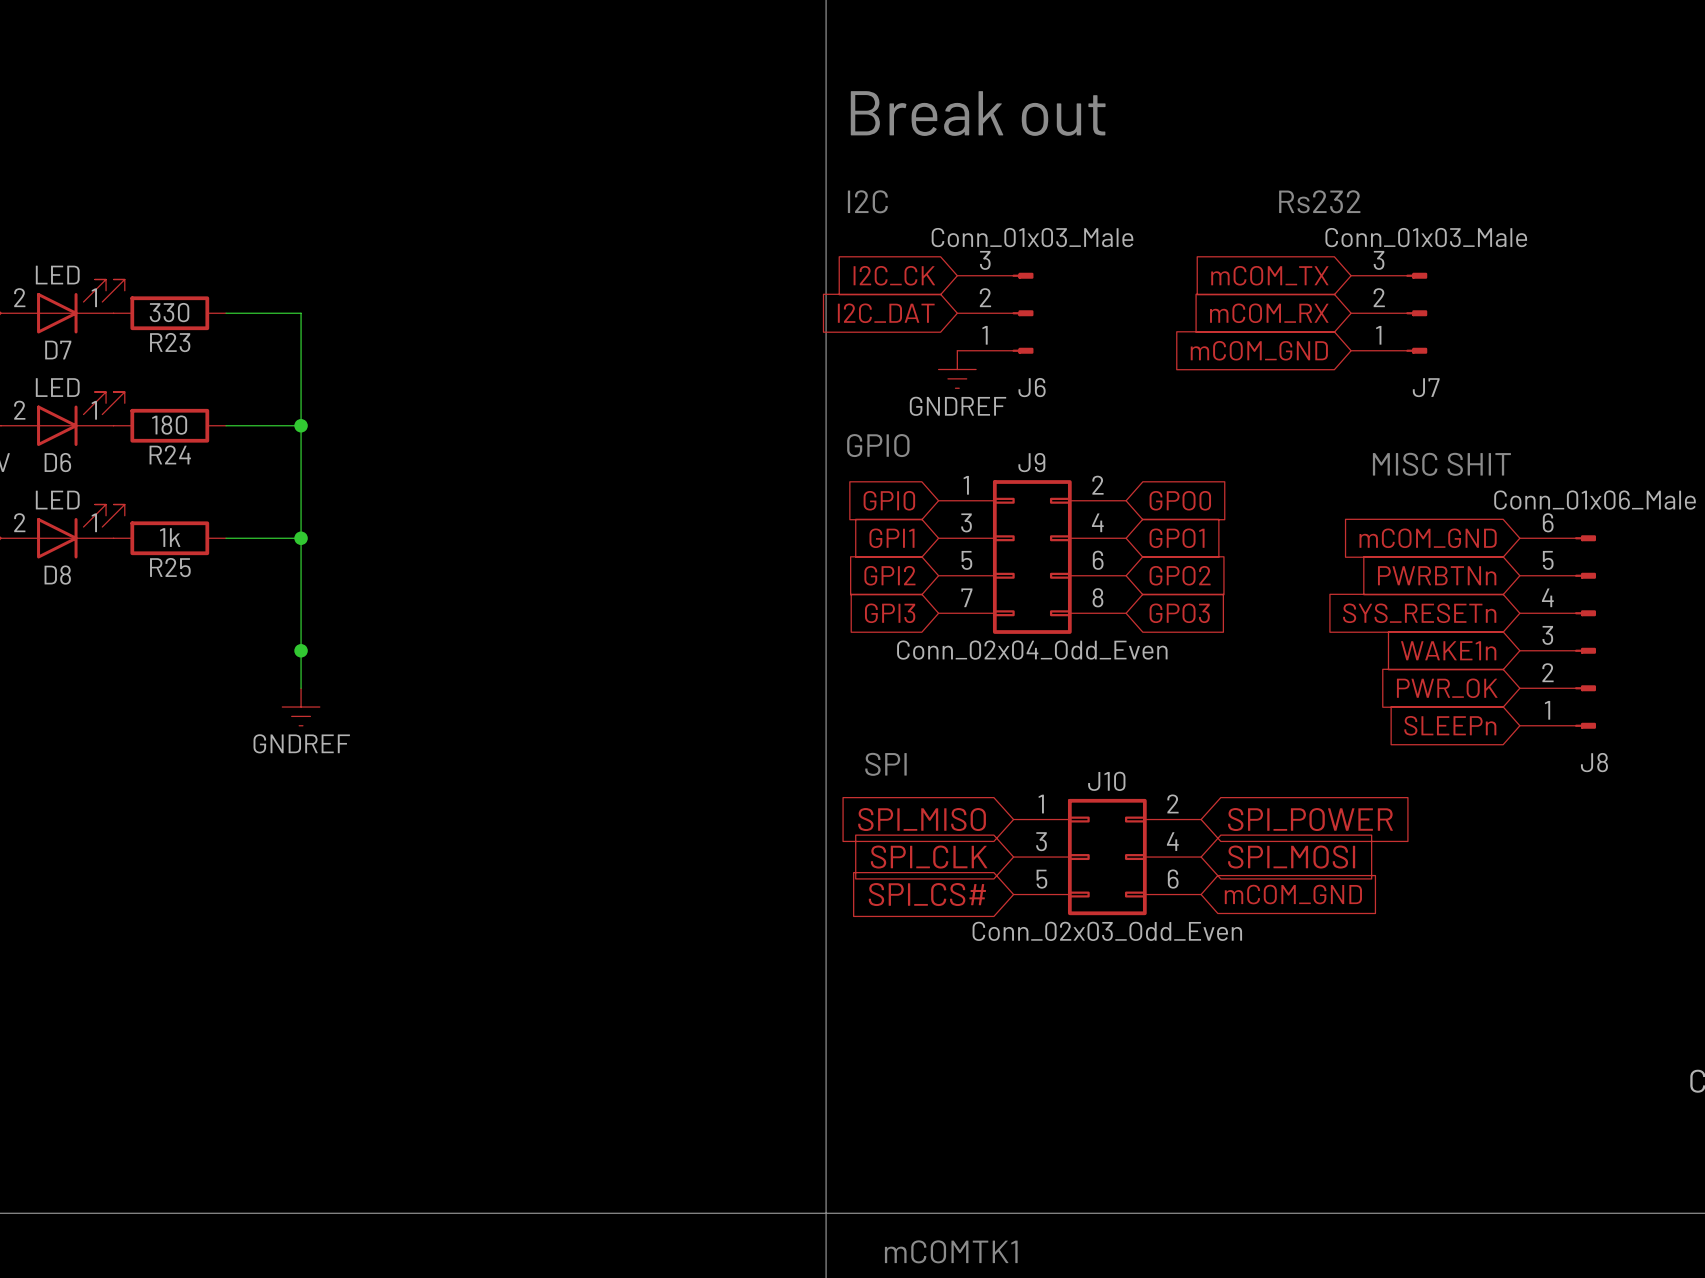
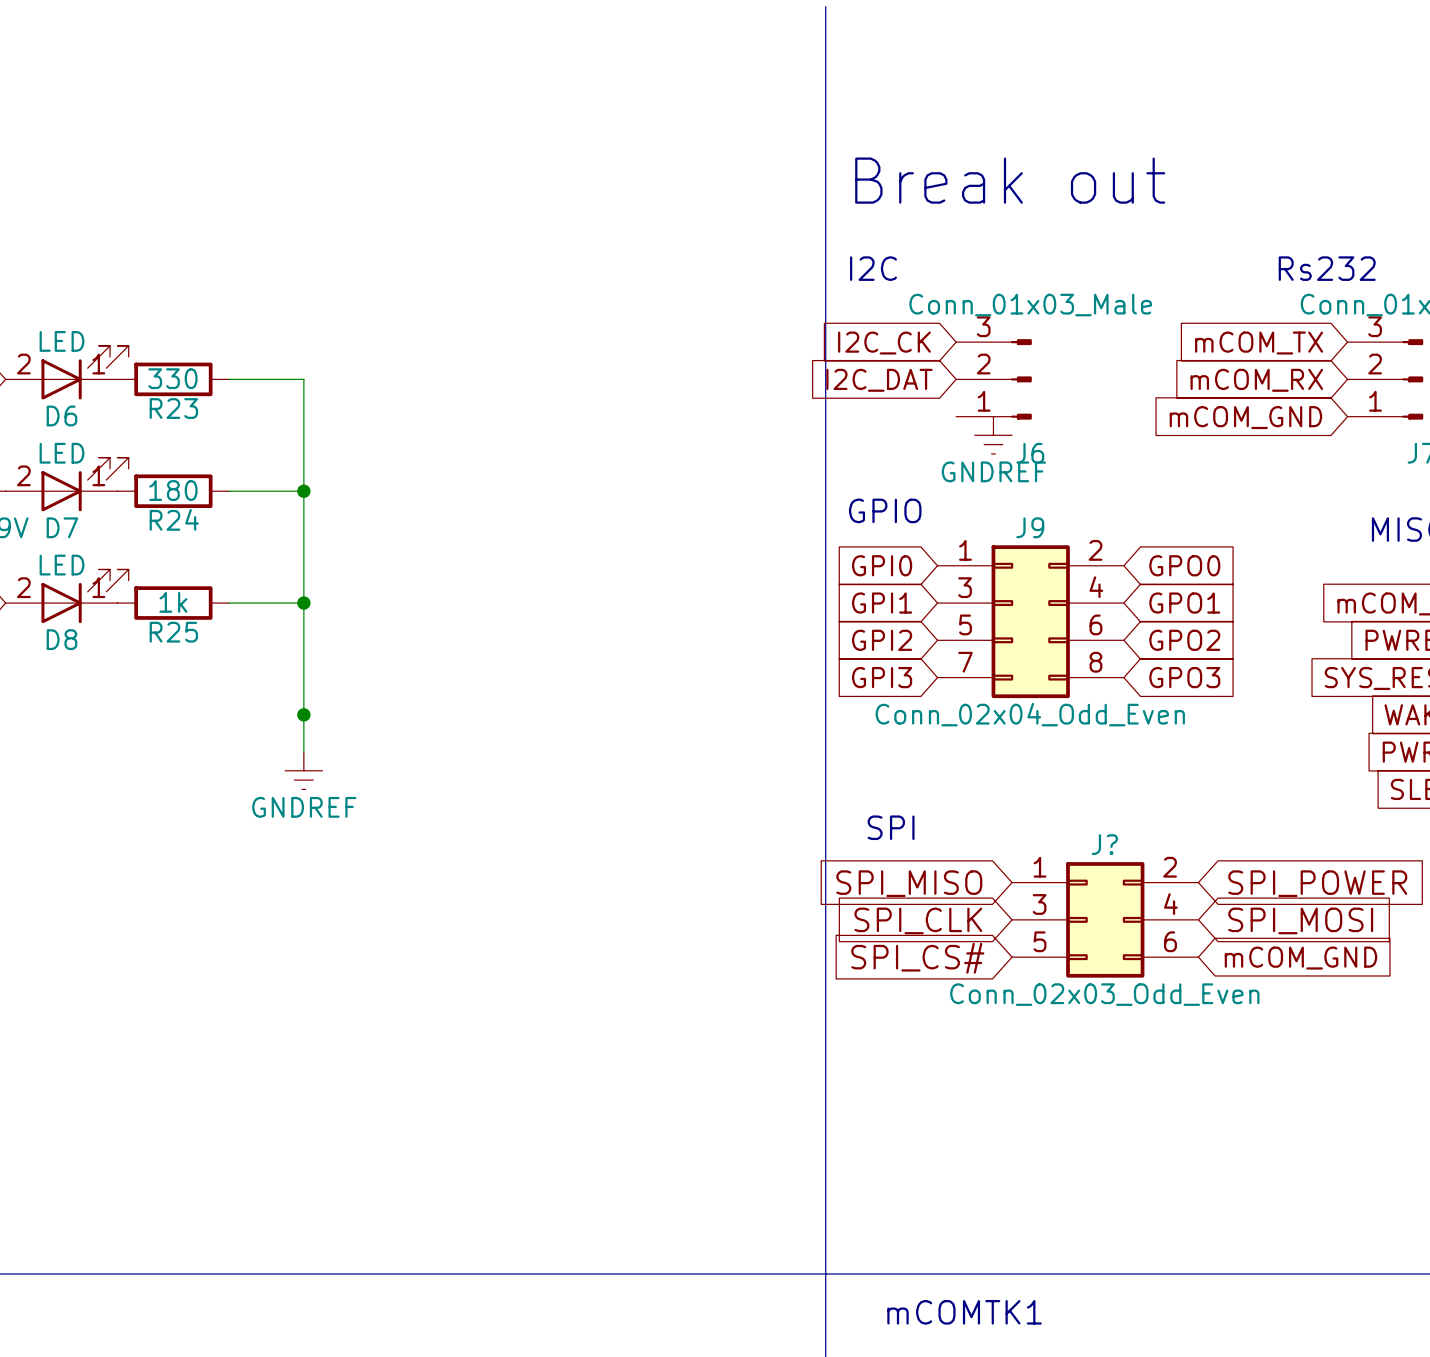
D7 name: D7 (58, 350) -> D6 (62, 415)
power symbol position: GNDREF (957, 369) -> GNDREF (993, 435)
D6 name: D6 (57, 462) -> D7 (62, 527)
J10 name: J10 (1106, 781) -> J? (1104, 844)

